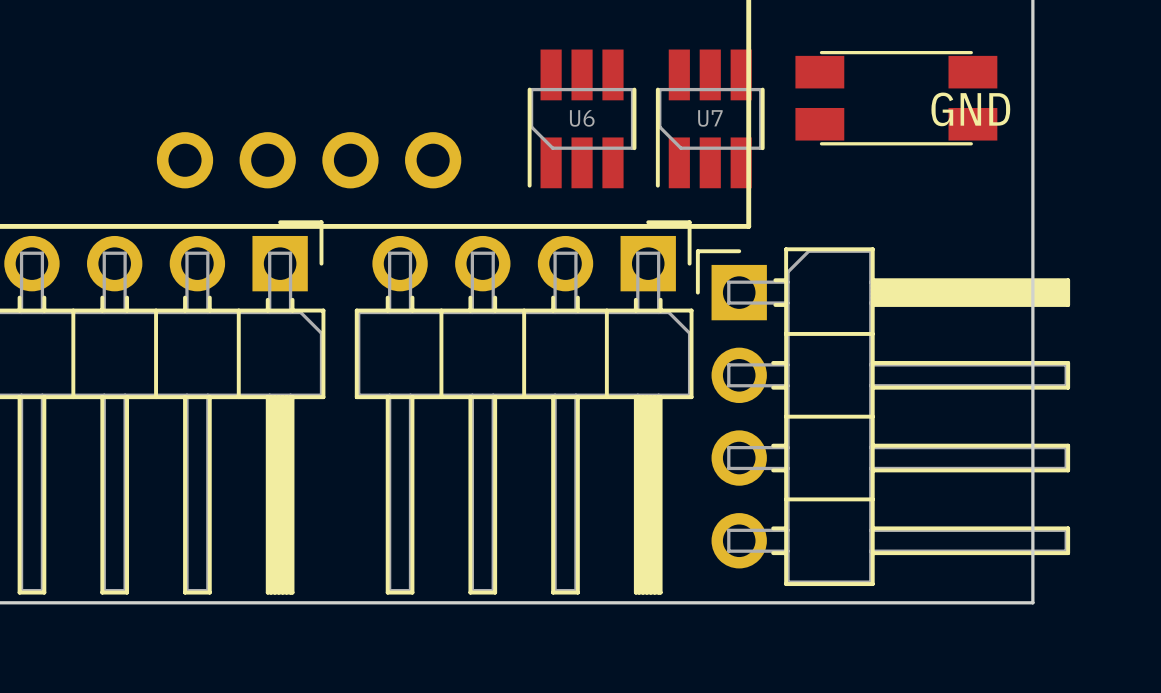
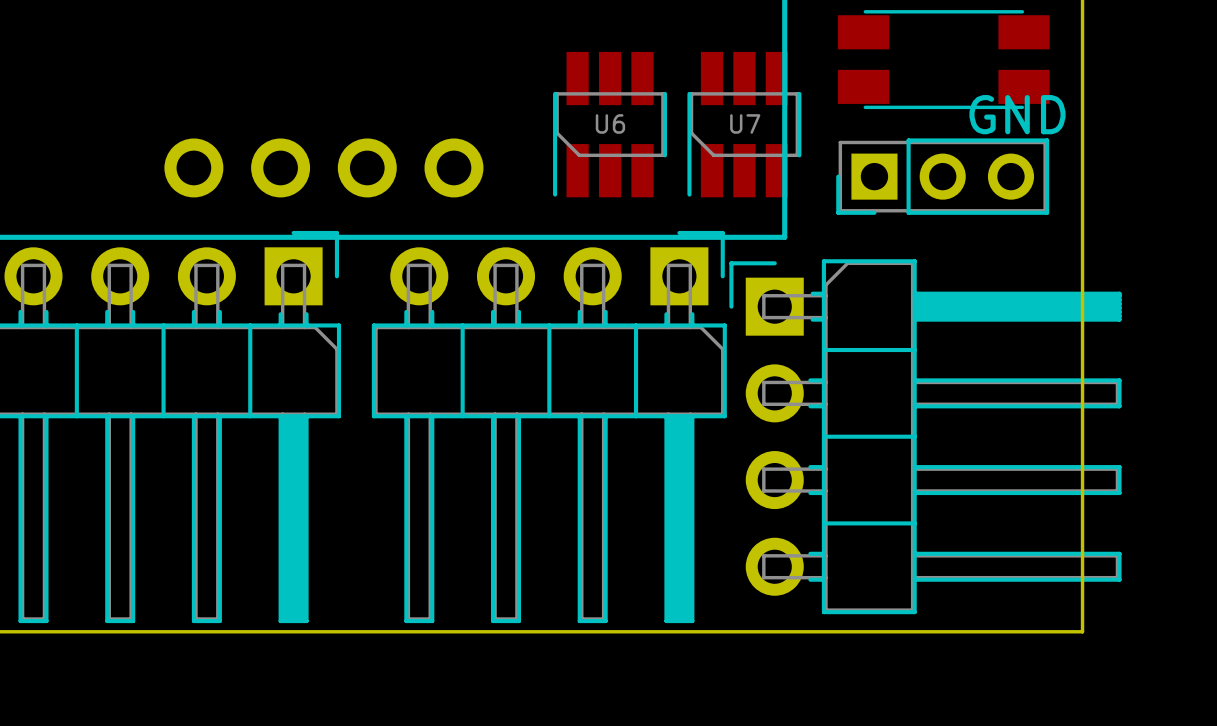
part position: (896, 98) -> (943, 59)
part: none -> (942, 176)

